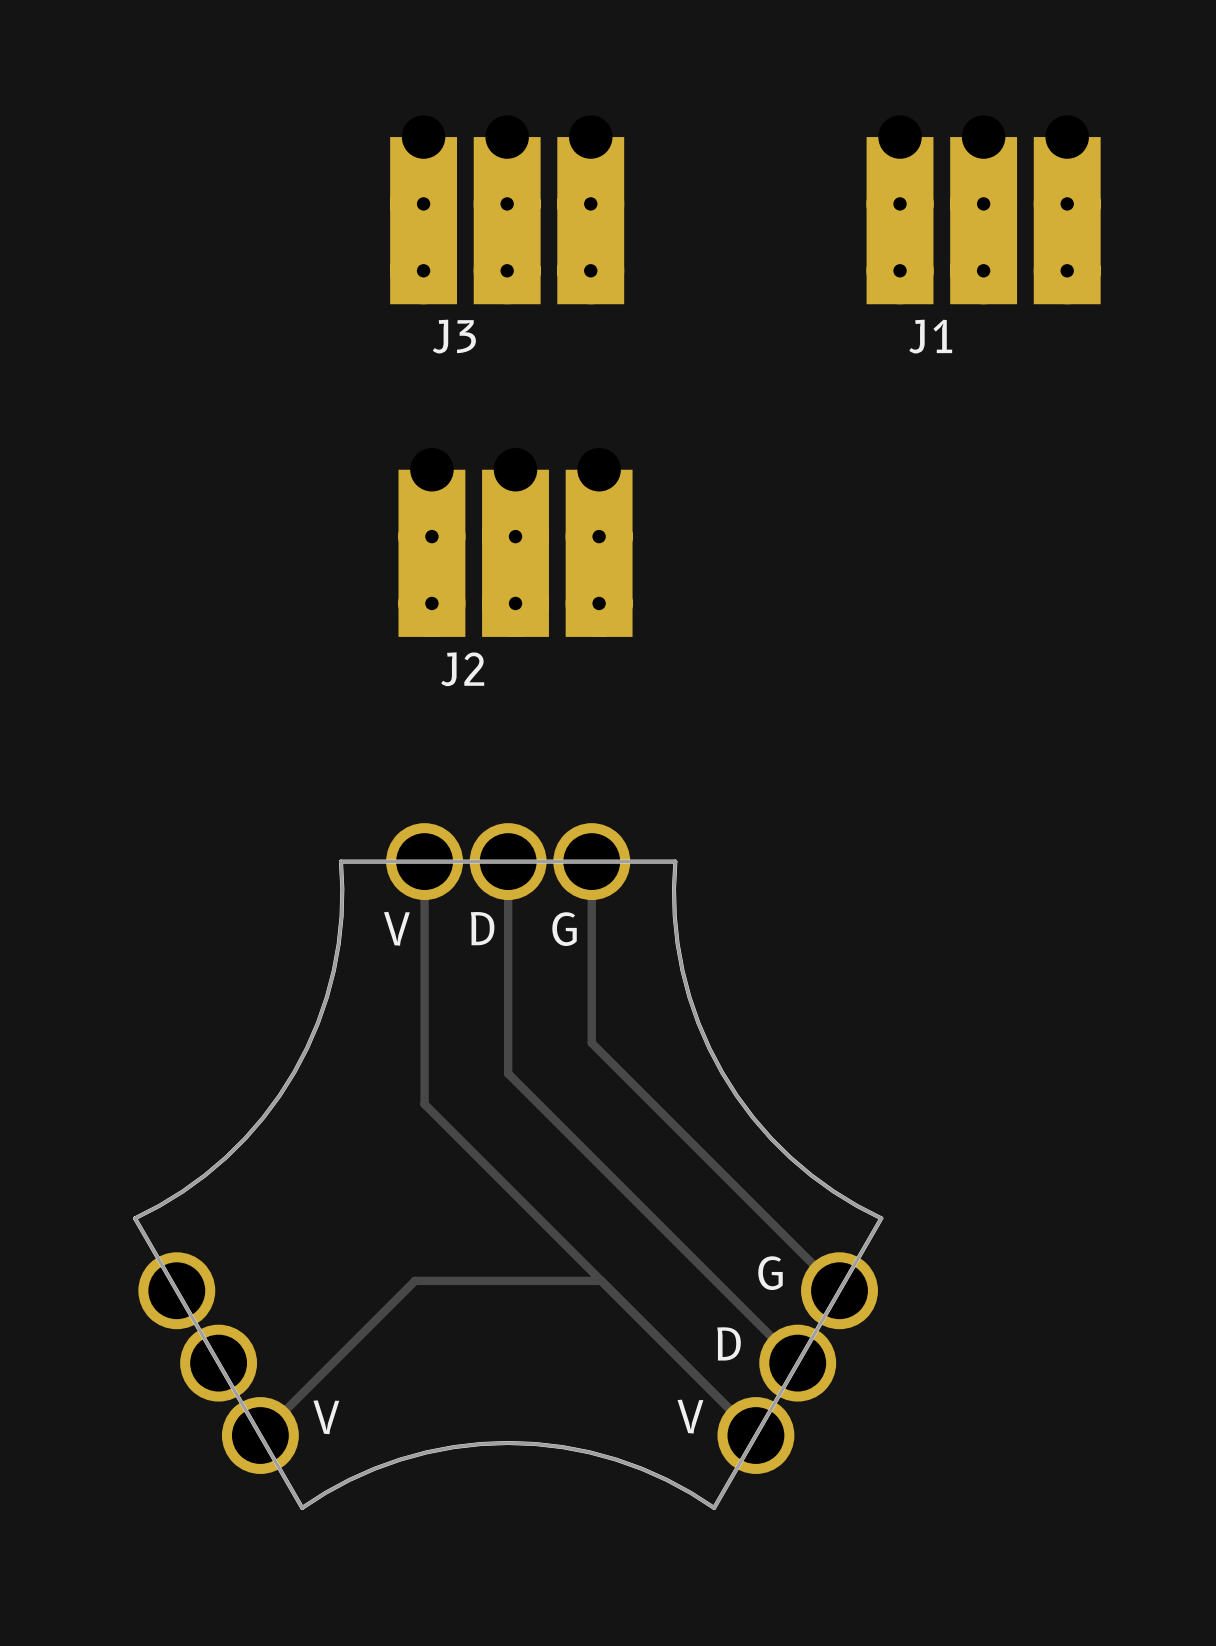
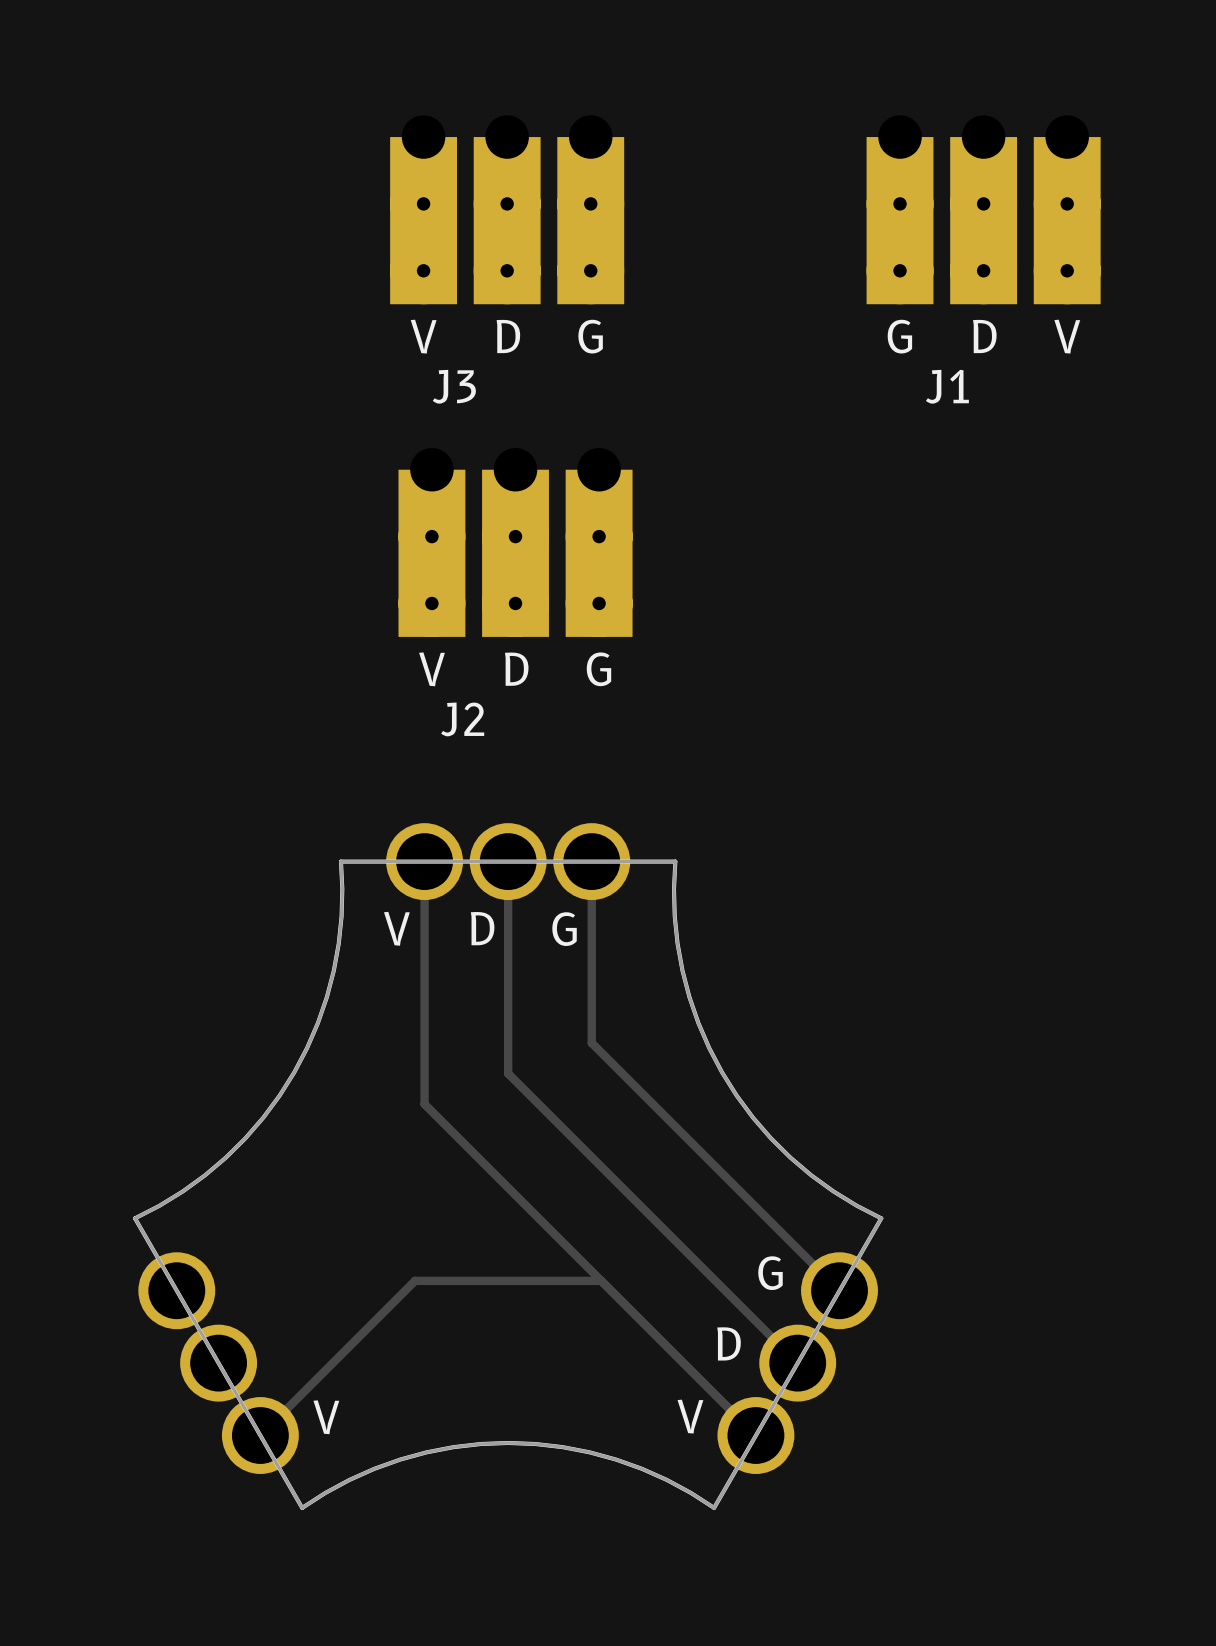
J3 text: none -> V (423, 336)
J3 name position: J3 (454, 336) -> J3 (454, 386)
J3 text: none -> D (508, 336)
J3 text: none -> G (590, 336)
J1 text: none -> G (899, 336)
J1 name position: J1 (930, 336) -> J1 (947, 386)
J1 text: none -> D (984, 336)
J1 text: none -> V (1067, 336)
J2 text: none -> V (432, 669)
J2 name position: J2 (462, 669) -> J2 (462, 719)
J2 text: none -> D (516, 669)
J2 text: none -> G (598, 669)

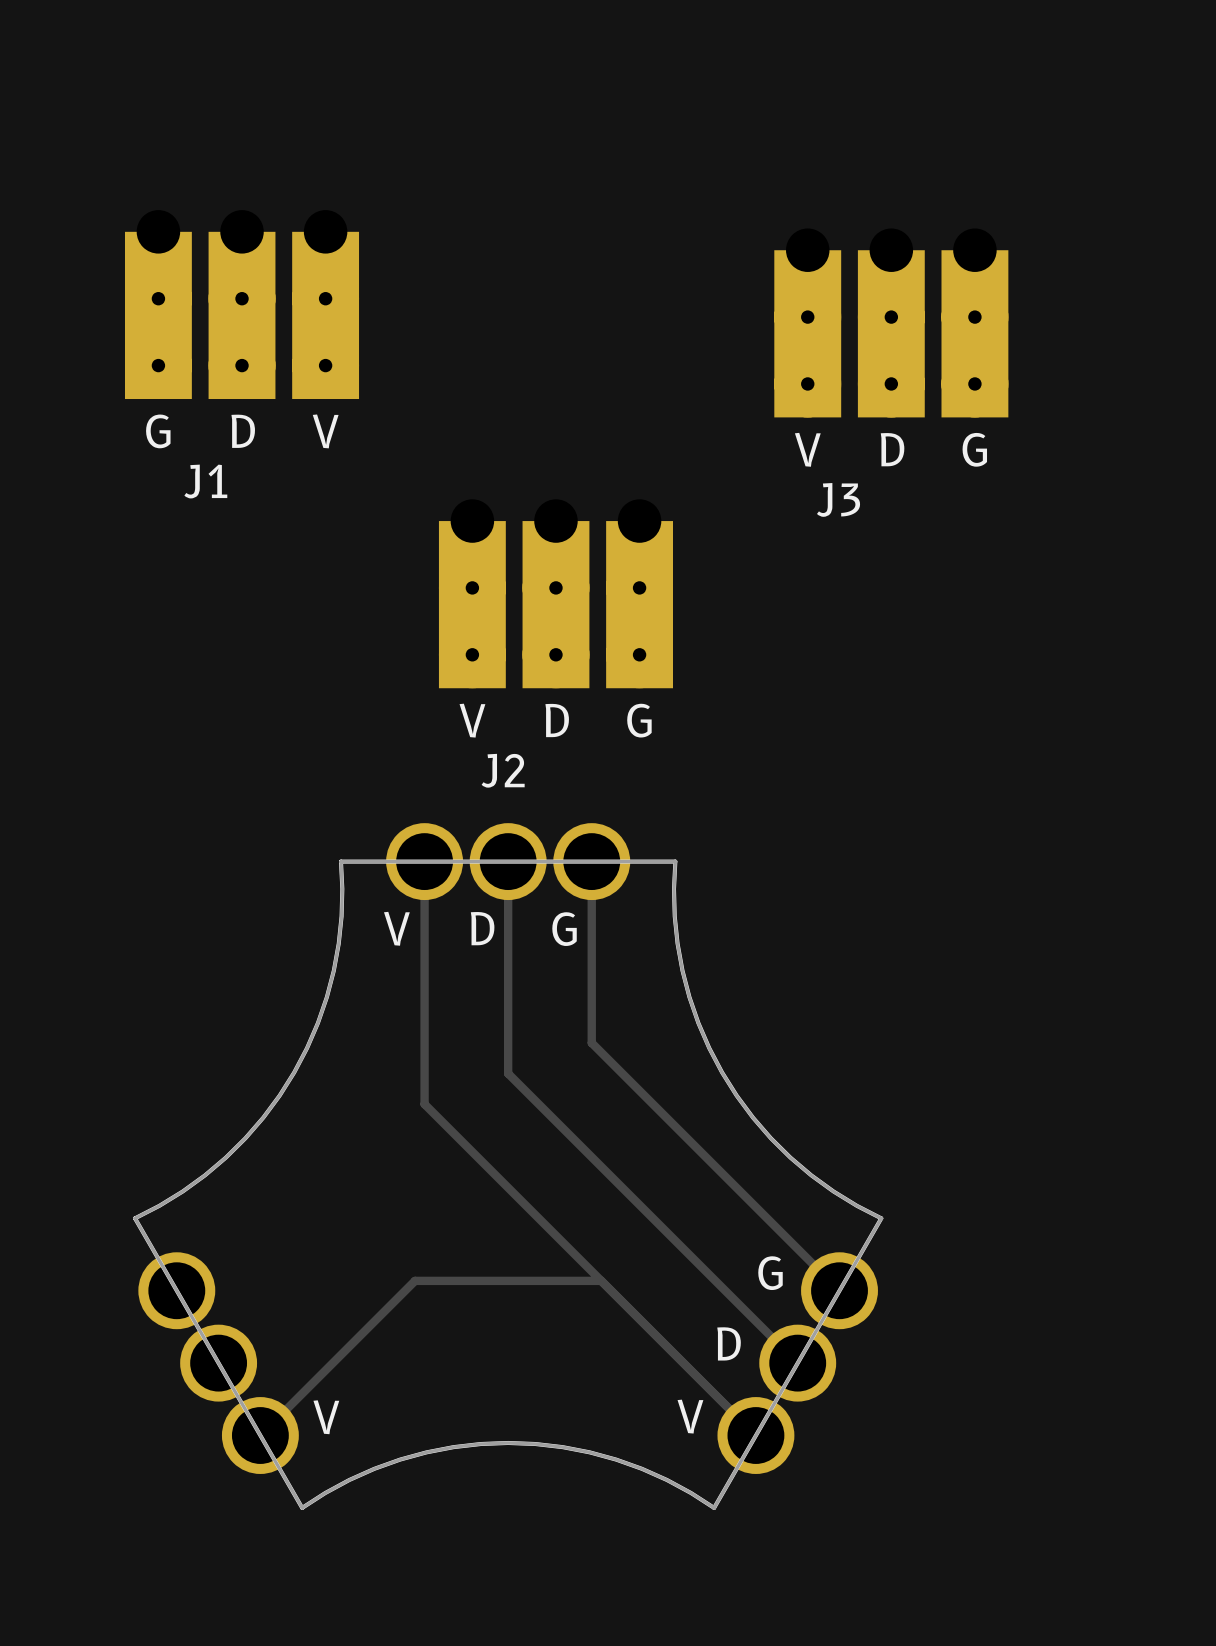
J3 position: (507, 209) -> (891, 322)
J1 position: (983, 209) -> (242, 304)
J2 position: (515, 542) -> (555, 593)

